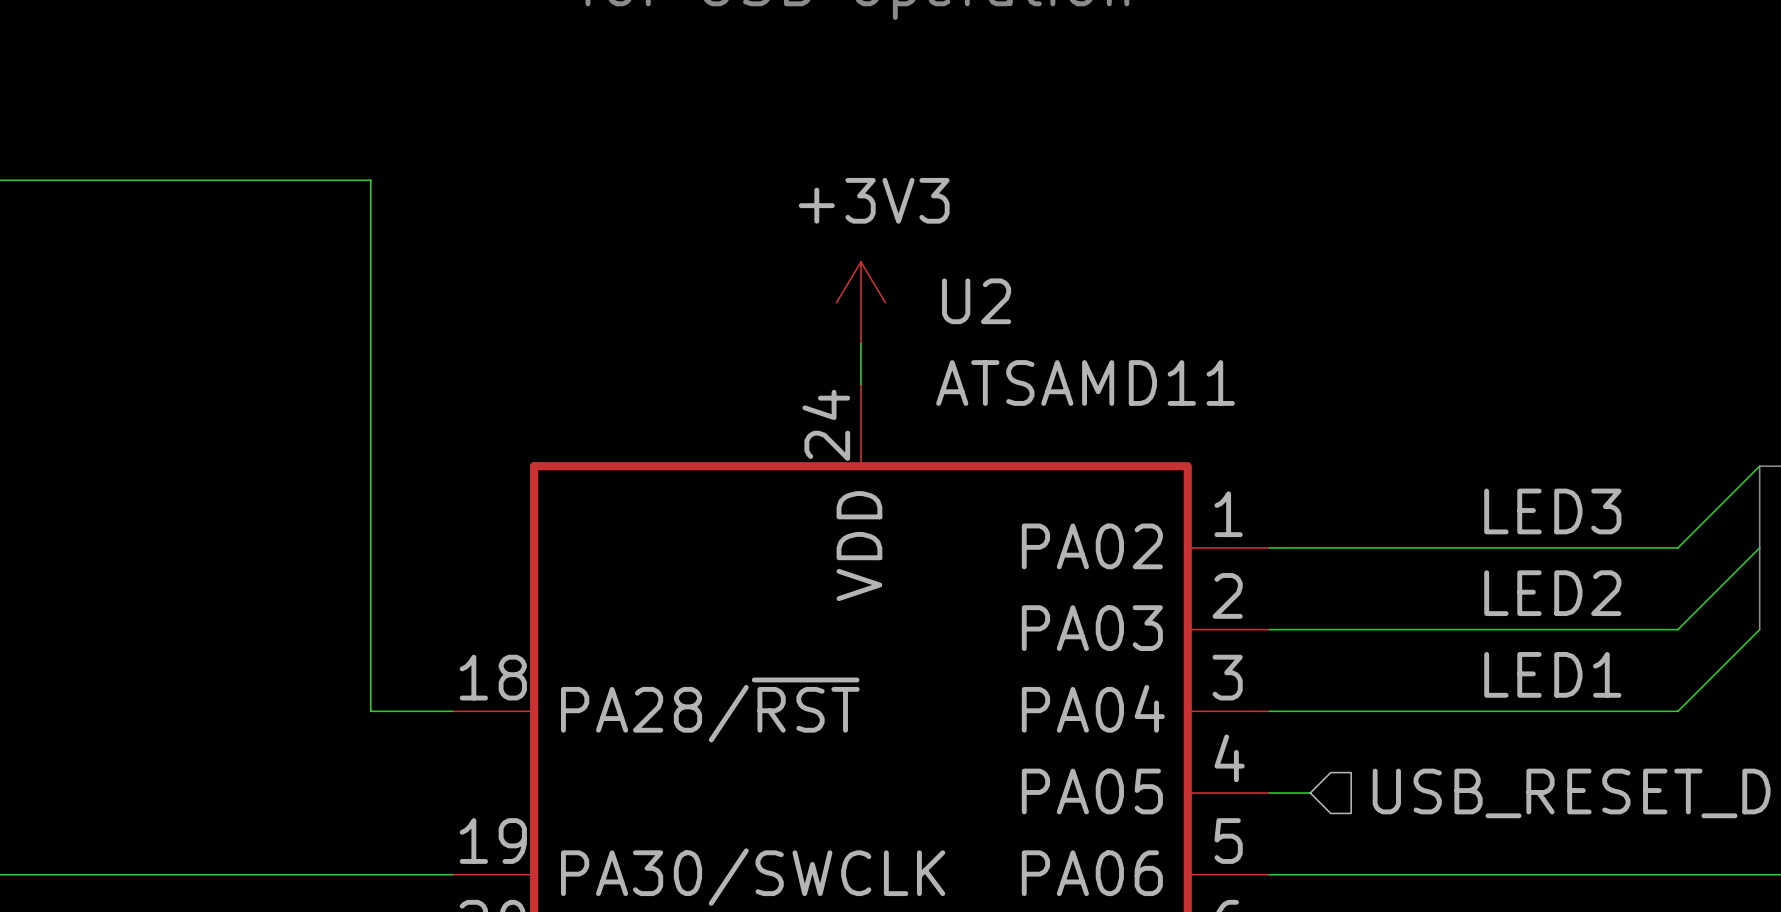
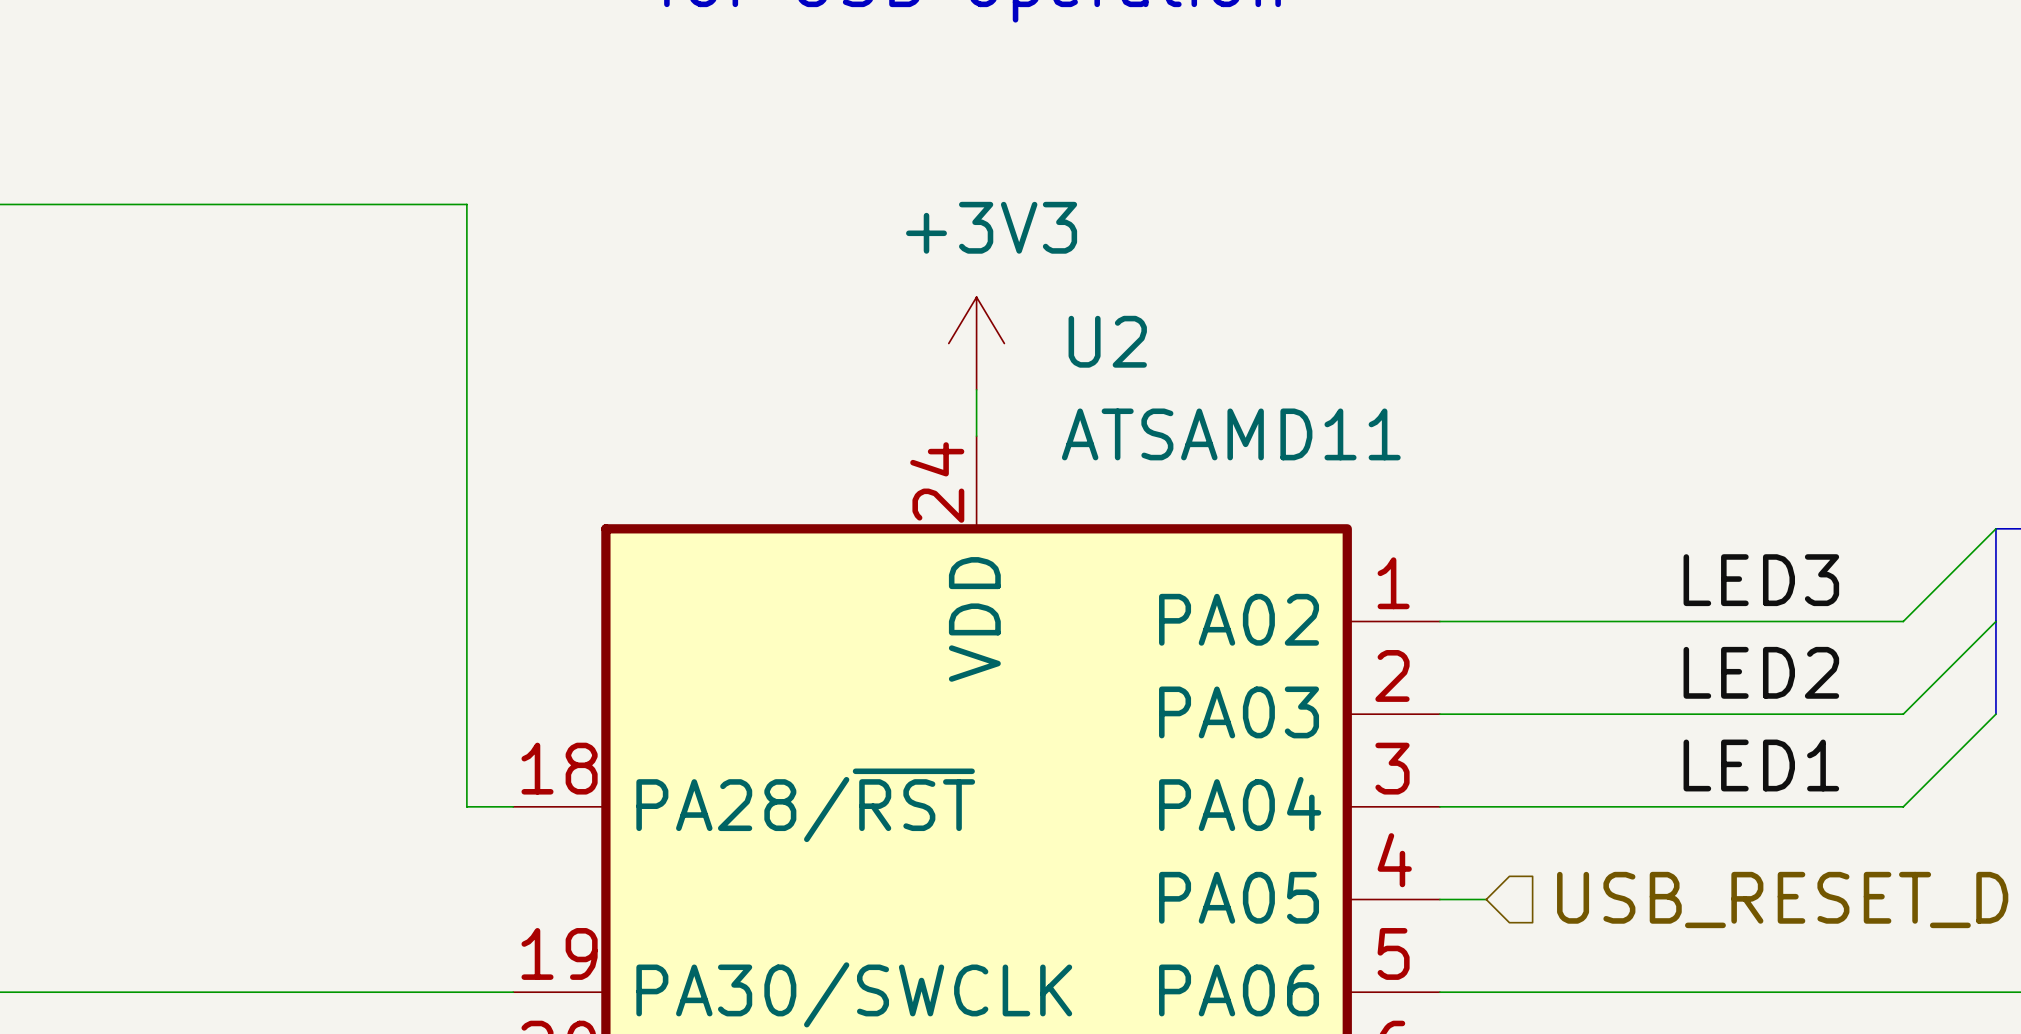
wire: (370, 180) (370, 711) (411, 711) -> (420, 204) (466, 204) (466, 806)

